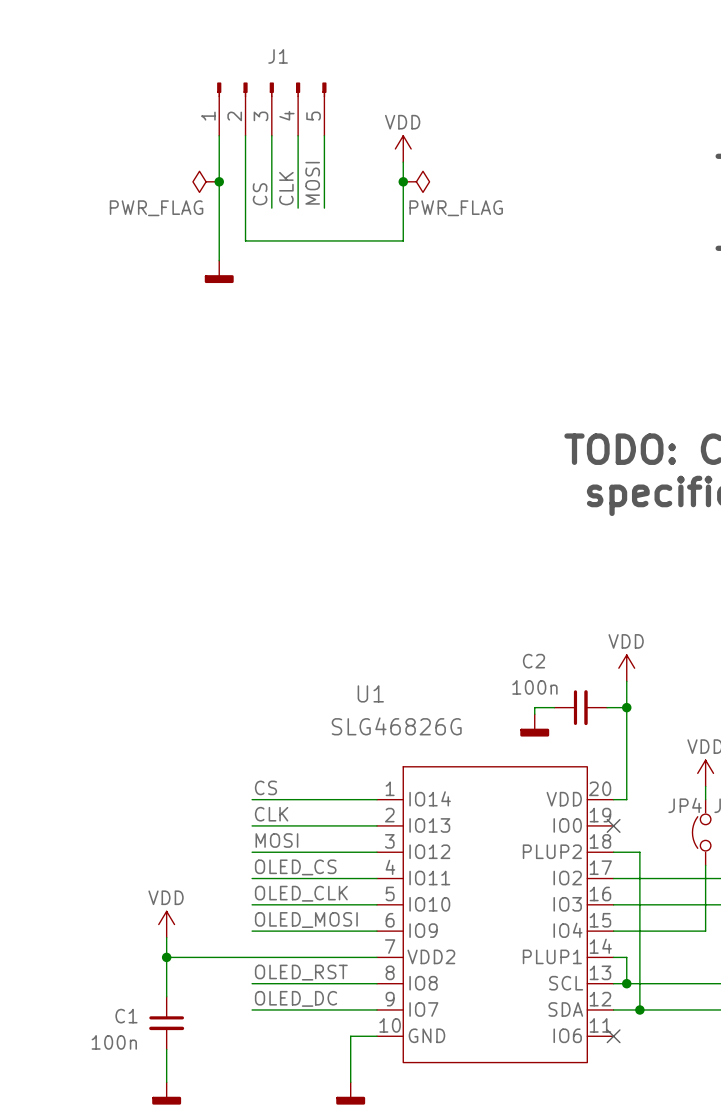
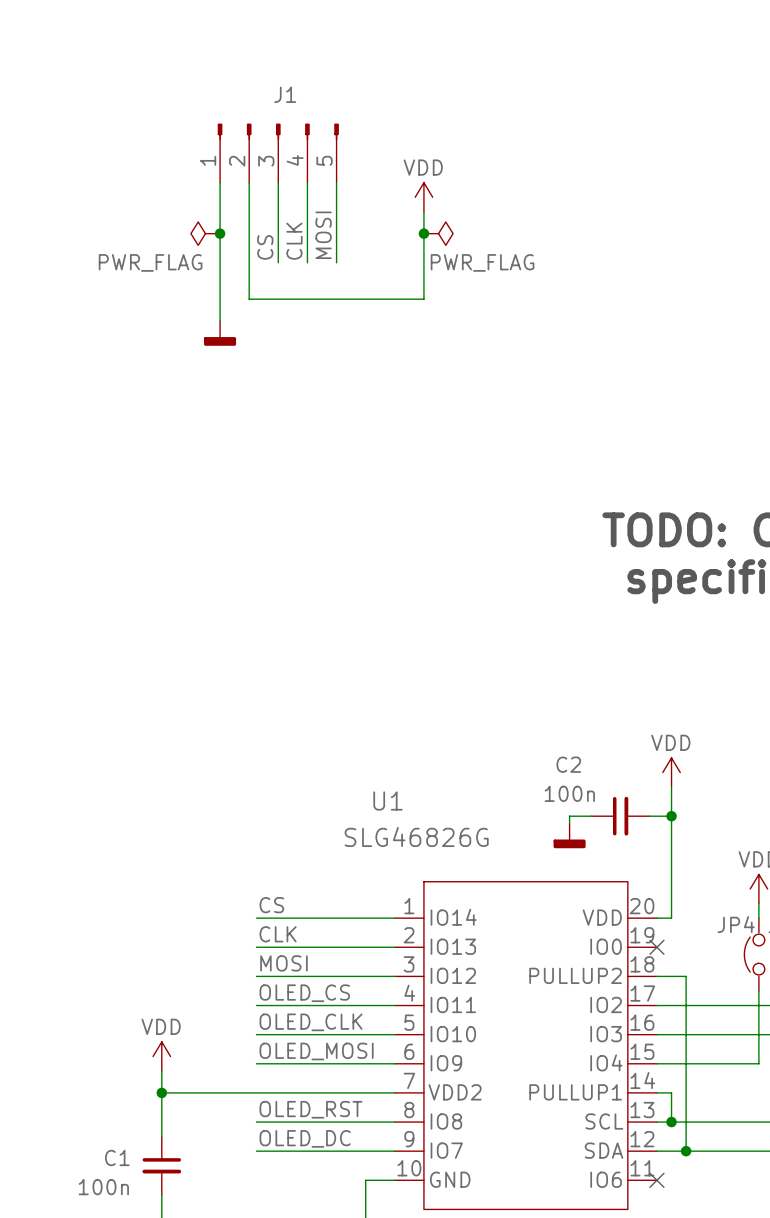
U1 pin name: PLUP2 (552, 851) -> PULLUP2 (575, 975)
U1 pin name: PLUP1 (552, 956) -> PULLUP1 (575, 1092)

